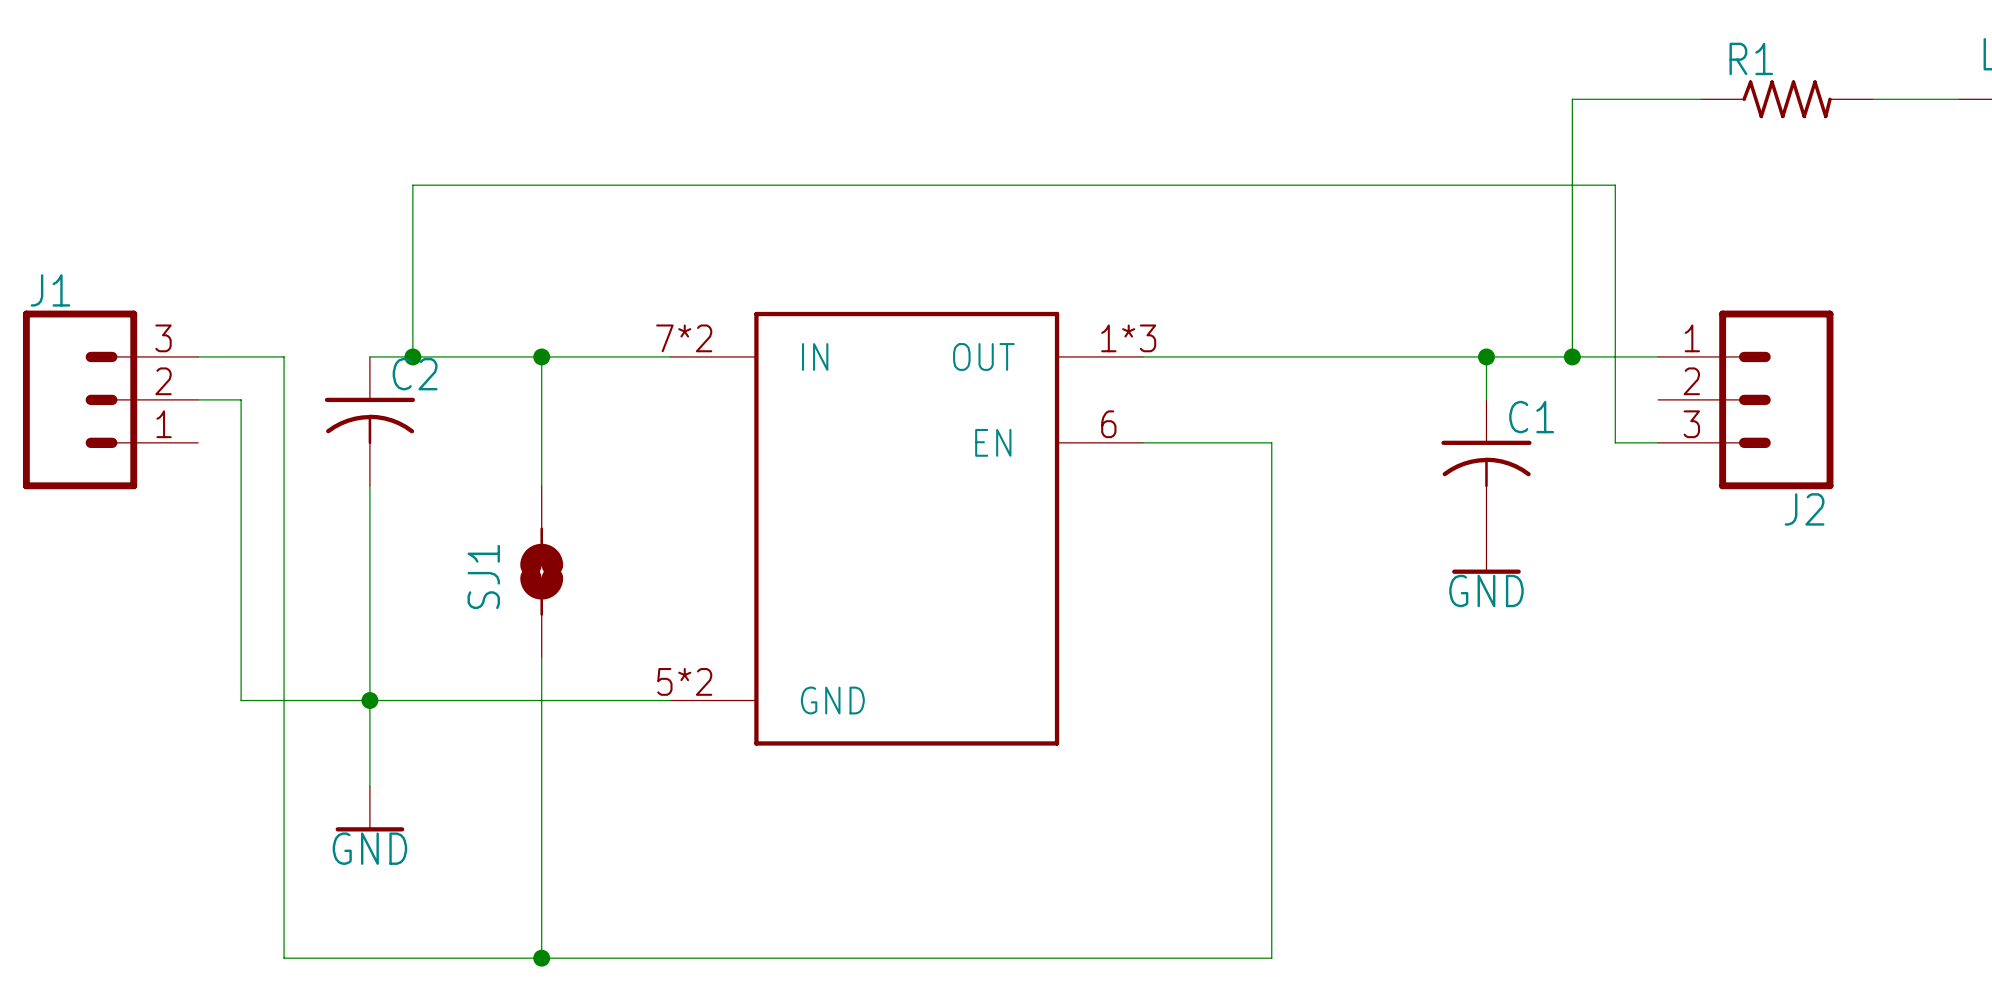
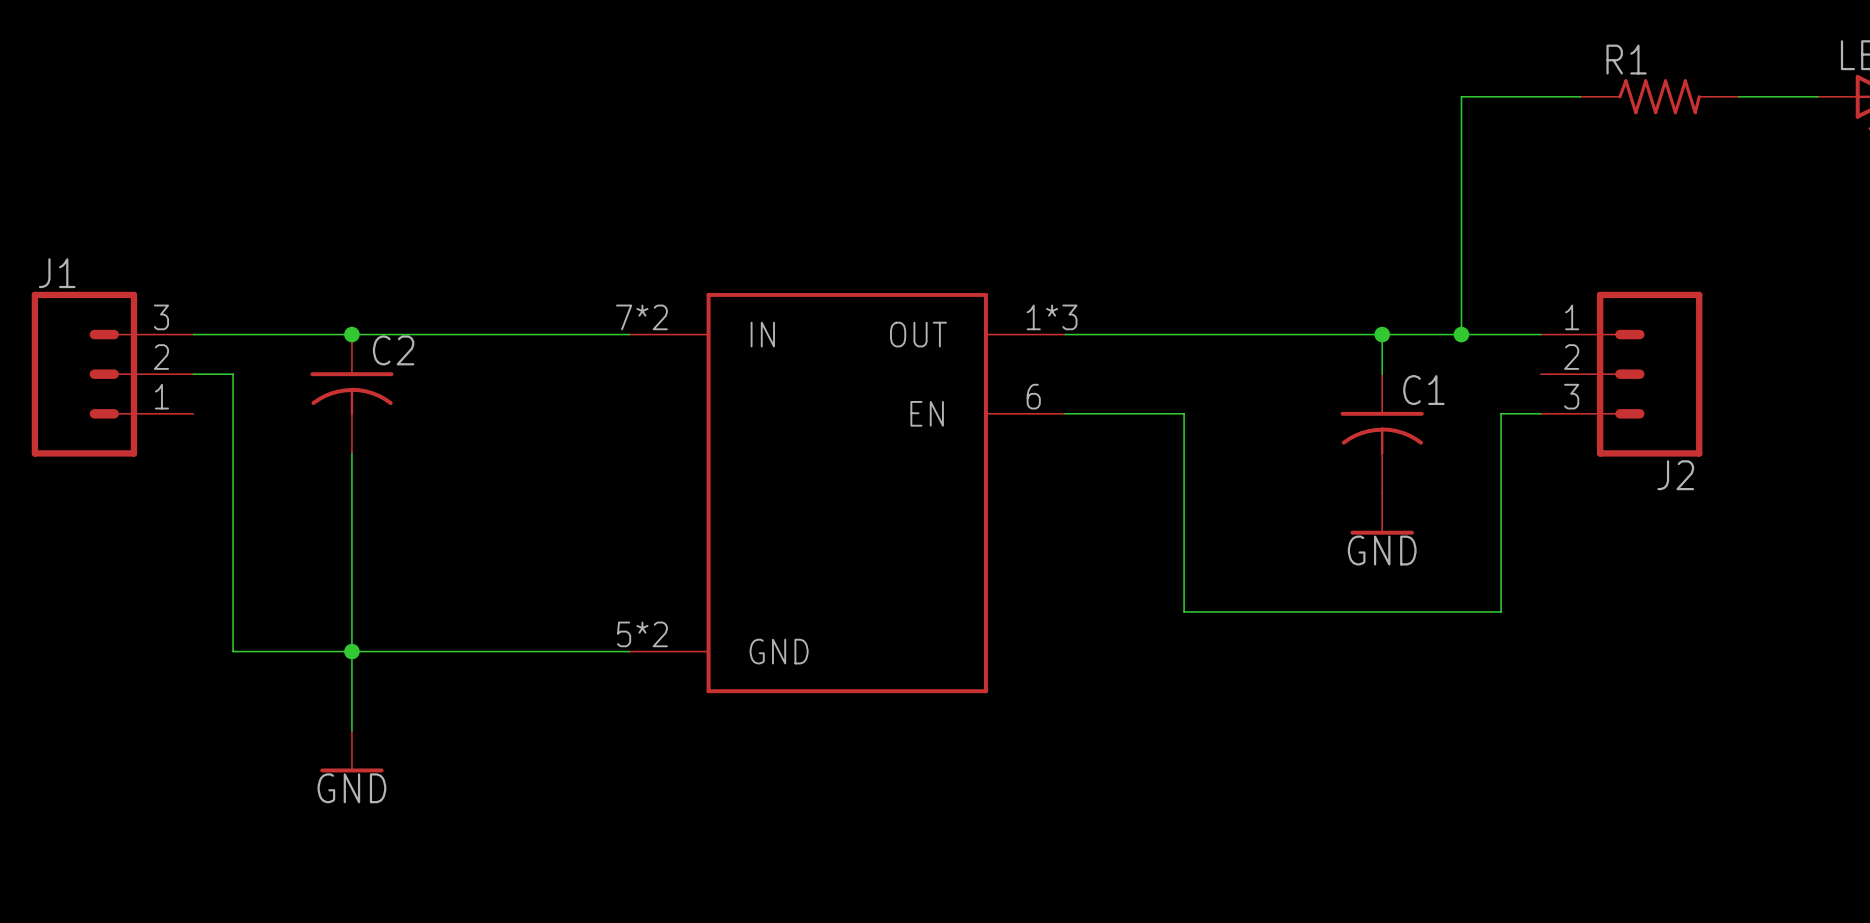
wire: (284, 356) (284, 958) (1271, 958) (1271, 657) -> (272, 334) (351, 334)
wire: (412, 356) (412, 185) (1615, 185) (1615, 442) -> (1184, 611) (1501, 611) (1501, 413)
junction position: (412, 356) -> (351, 334)
wire: (541, 356) (541, 485) -> none
junction: (541, 356) -> none
SJ1: (541, 571) -> none
wire: (541, 657) (541, 958) -> none
junction: (541, 958) -> none

